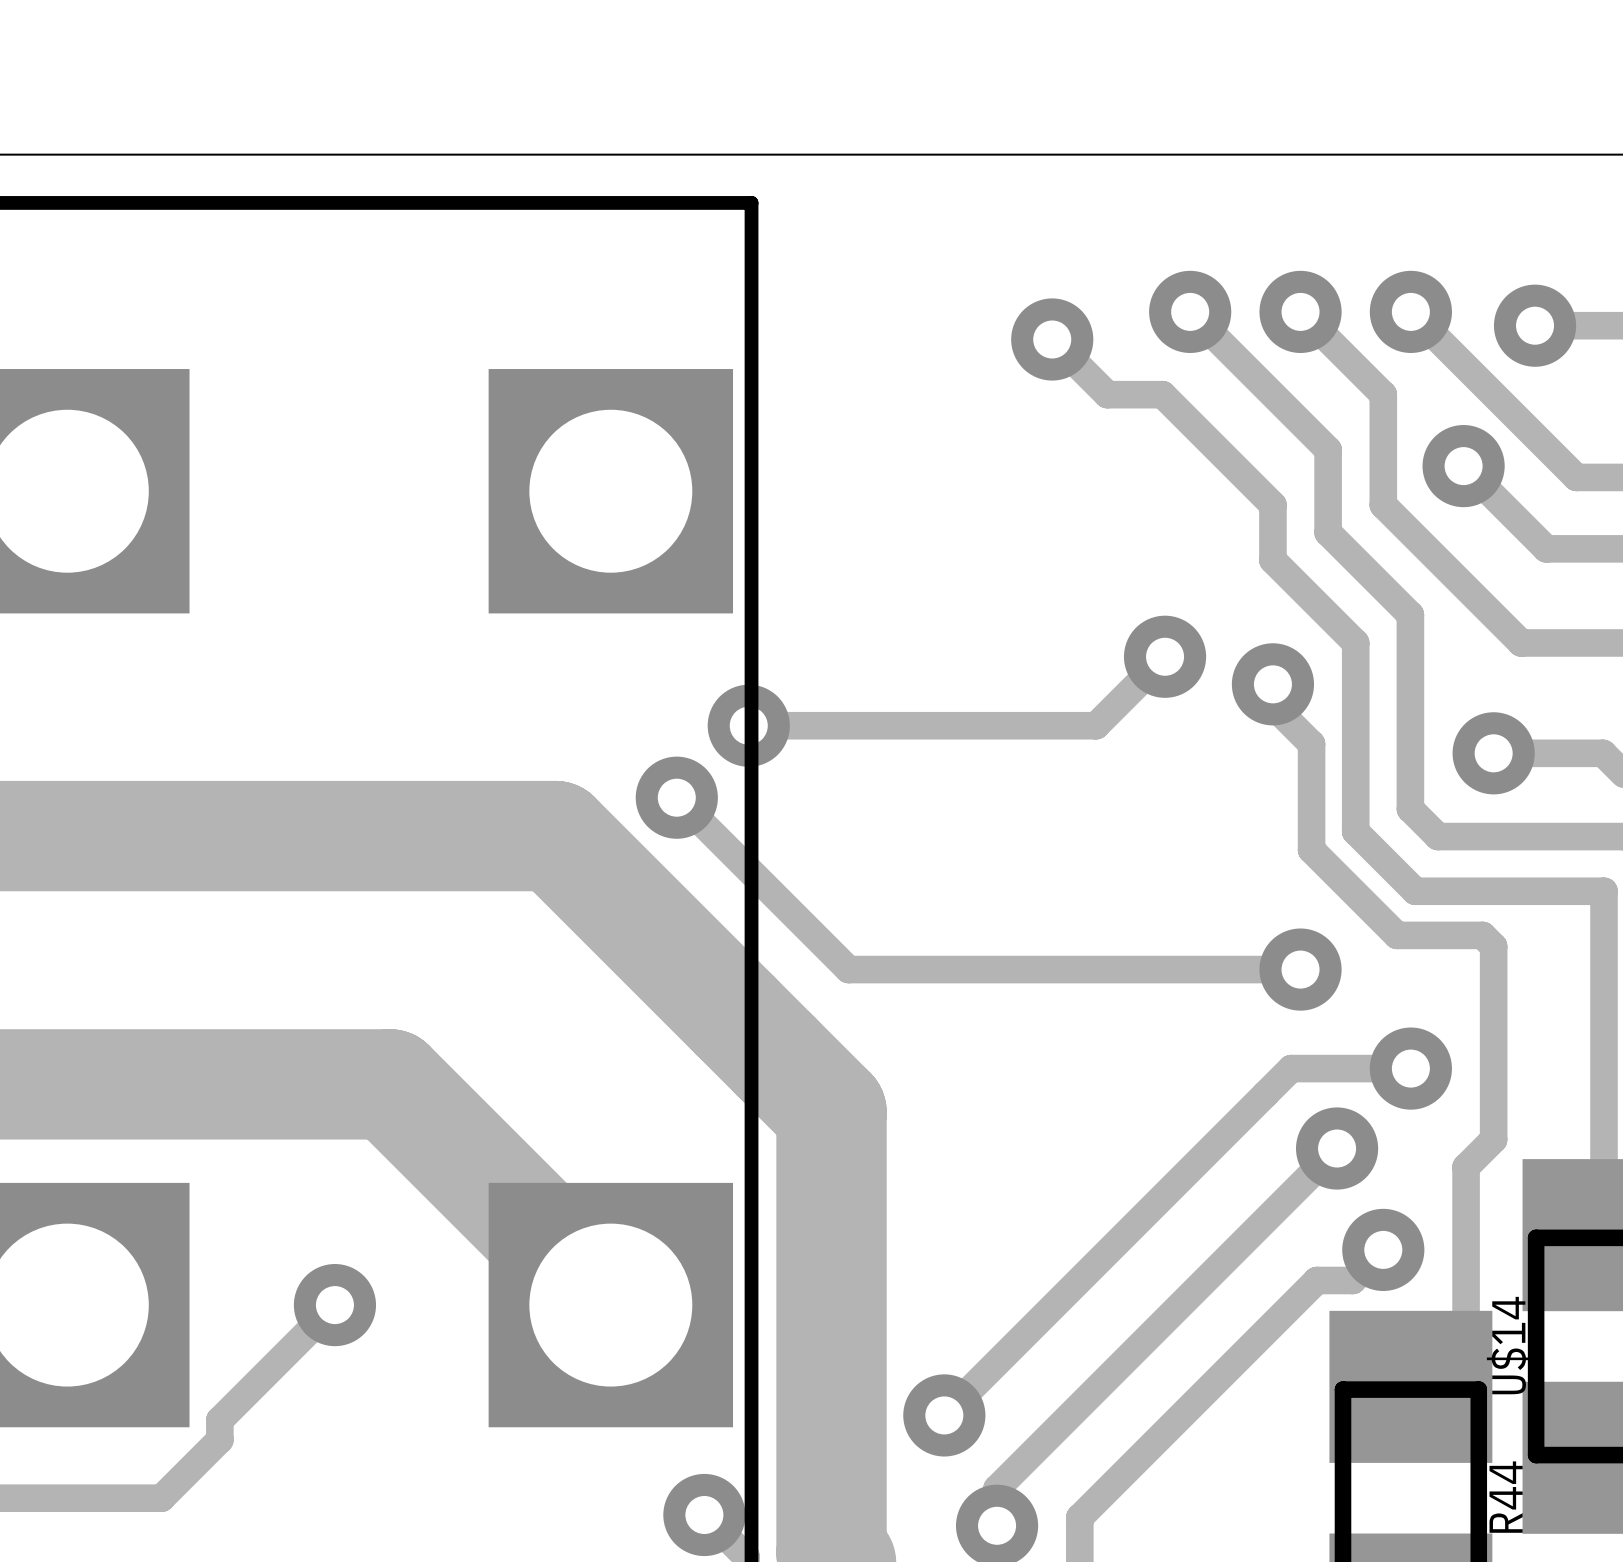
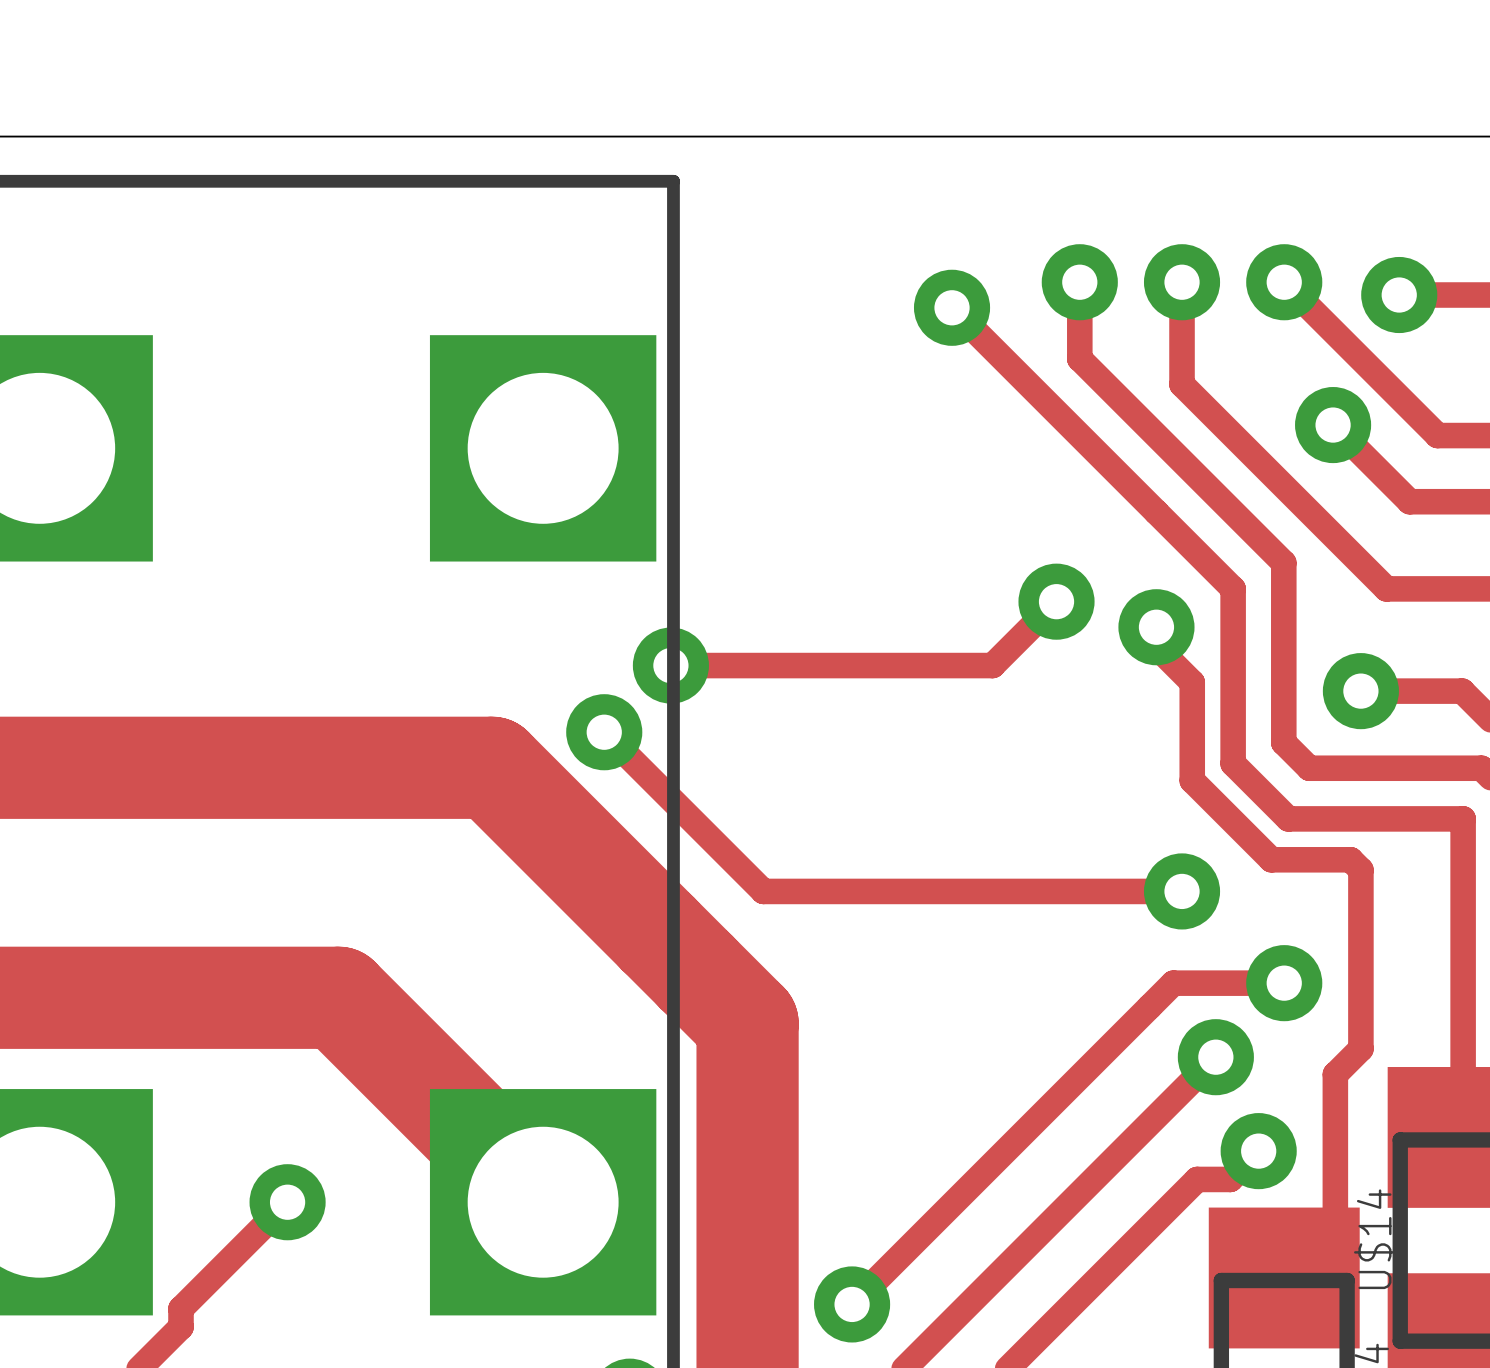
track: (1190, 311) (1300, 422) -> (1182, 282) (1182, 384)
track: none -> (1079, 282) (1079, 358) (1207, 486)
track: (1300, 311) (1383, 394) (1383, 505) -> none
track: (1107, 394) (1162, 394) (1272, 505) (1272, 560) -> (1003, 358) (1156, 512)
track: (1328, 449) (1328, 532) -> (1207, 410) (1258, 461)

